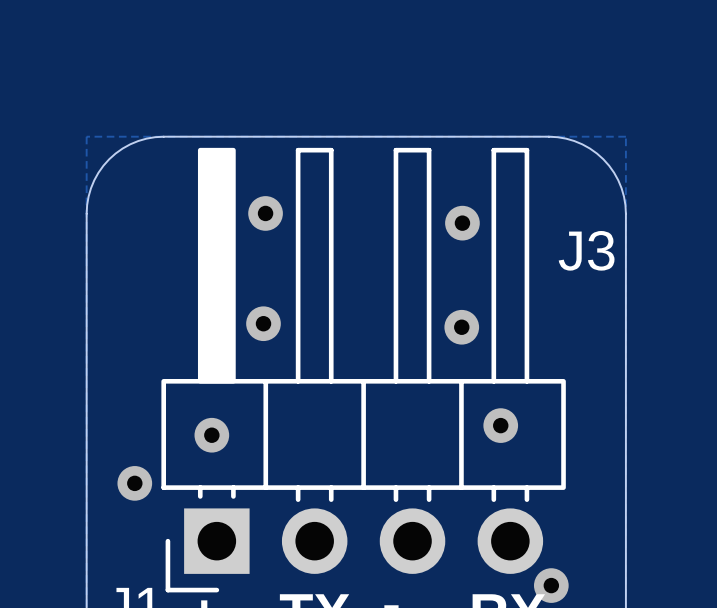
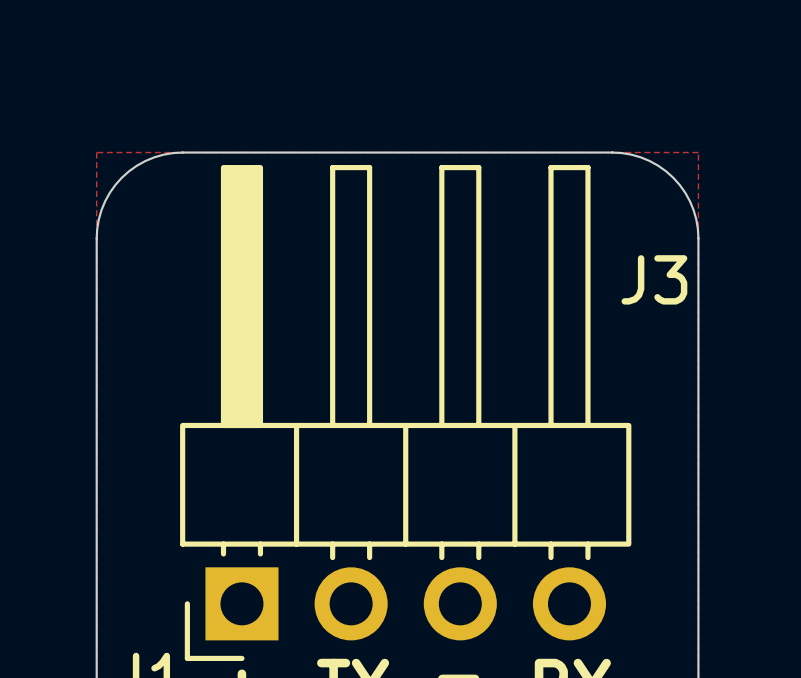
via: (265, 213) -> none
via: (462, 223) -> none
via: (263, 323) -> none
via: (461, 327) -> none
via: (500, 425) -> none
via: (211, 435) -> none
via: (134, 483) -> none
via: (551, 585) -> none

